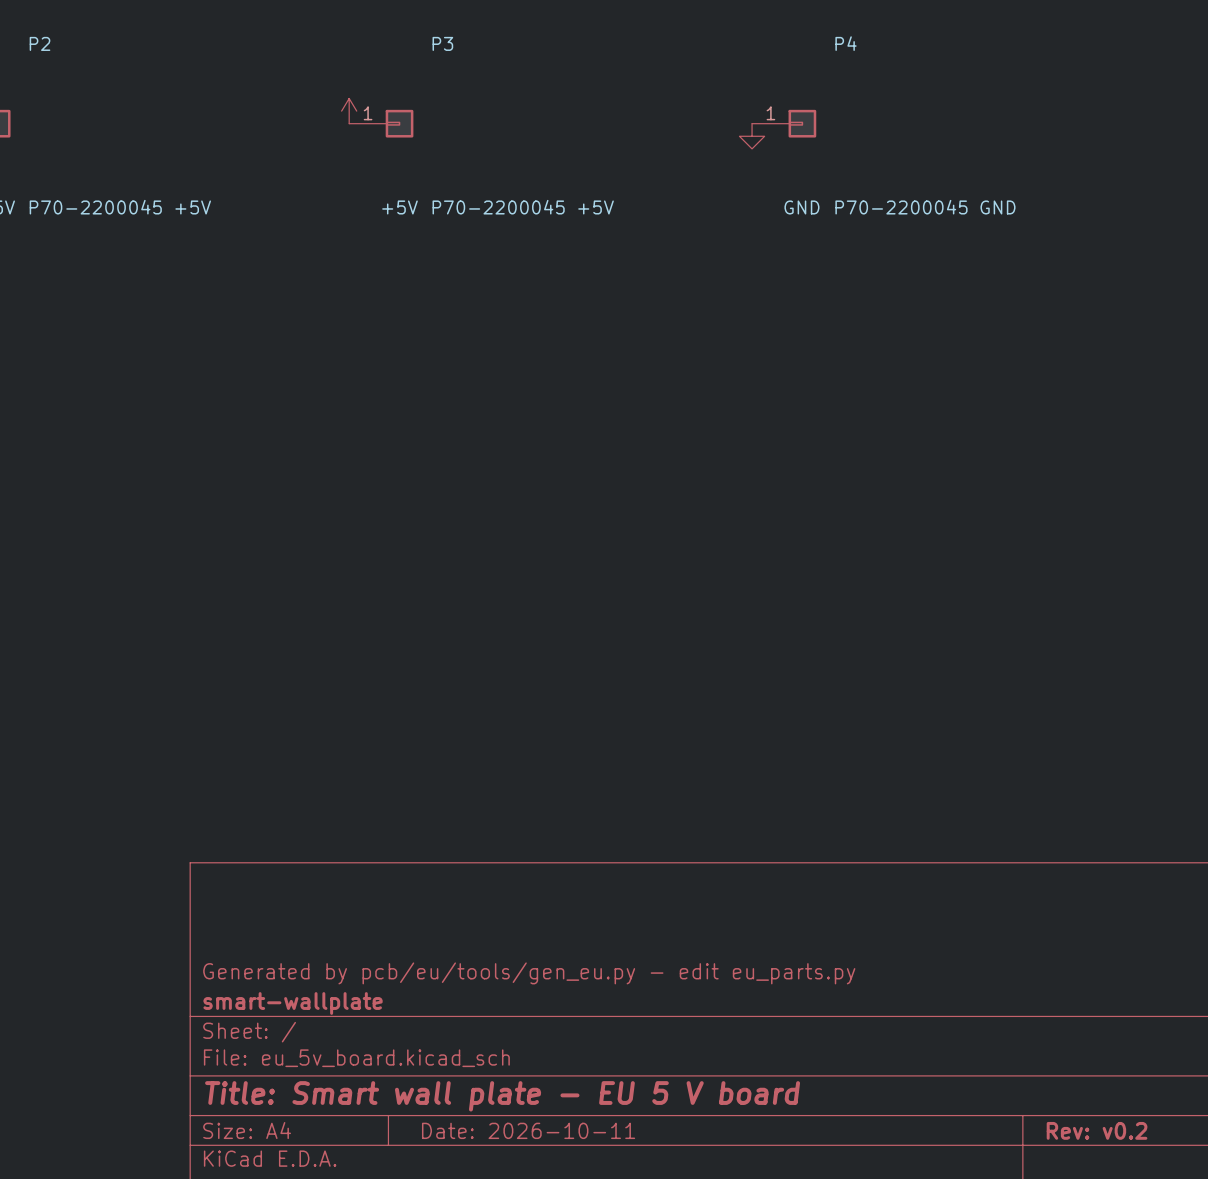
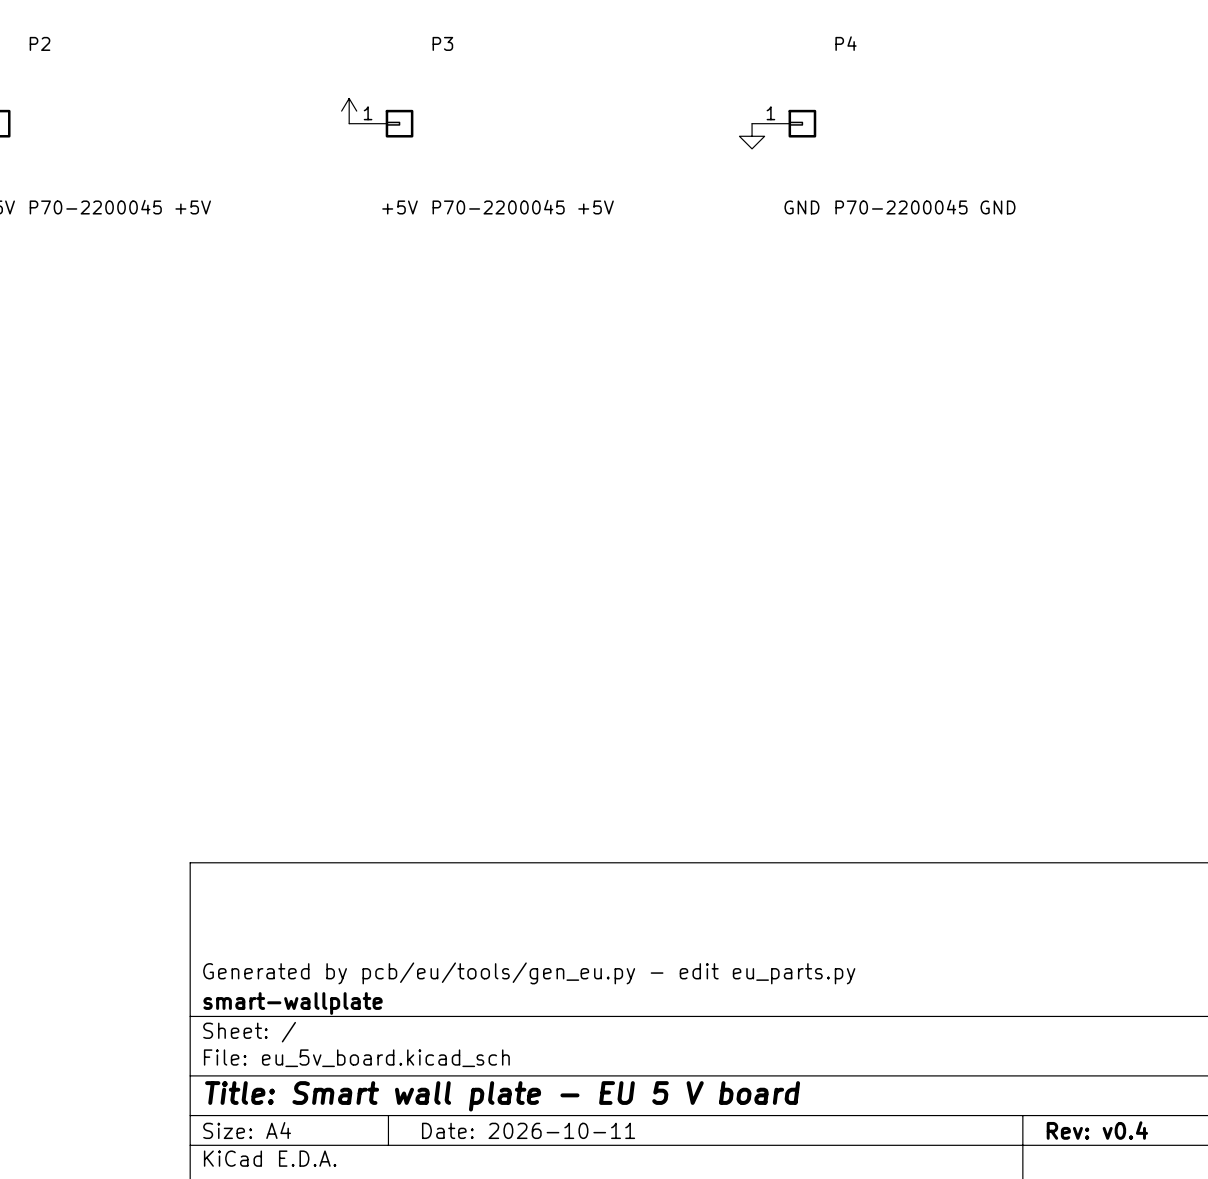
title block: Rev: v0.2 (1097, 1130) -> Rev: v0.4 (1097, 1130)

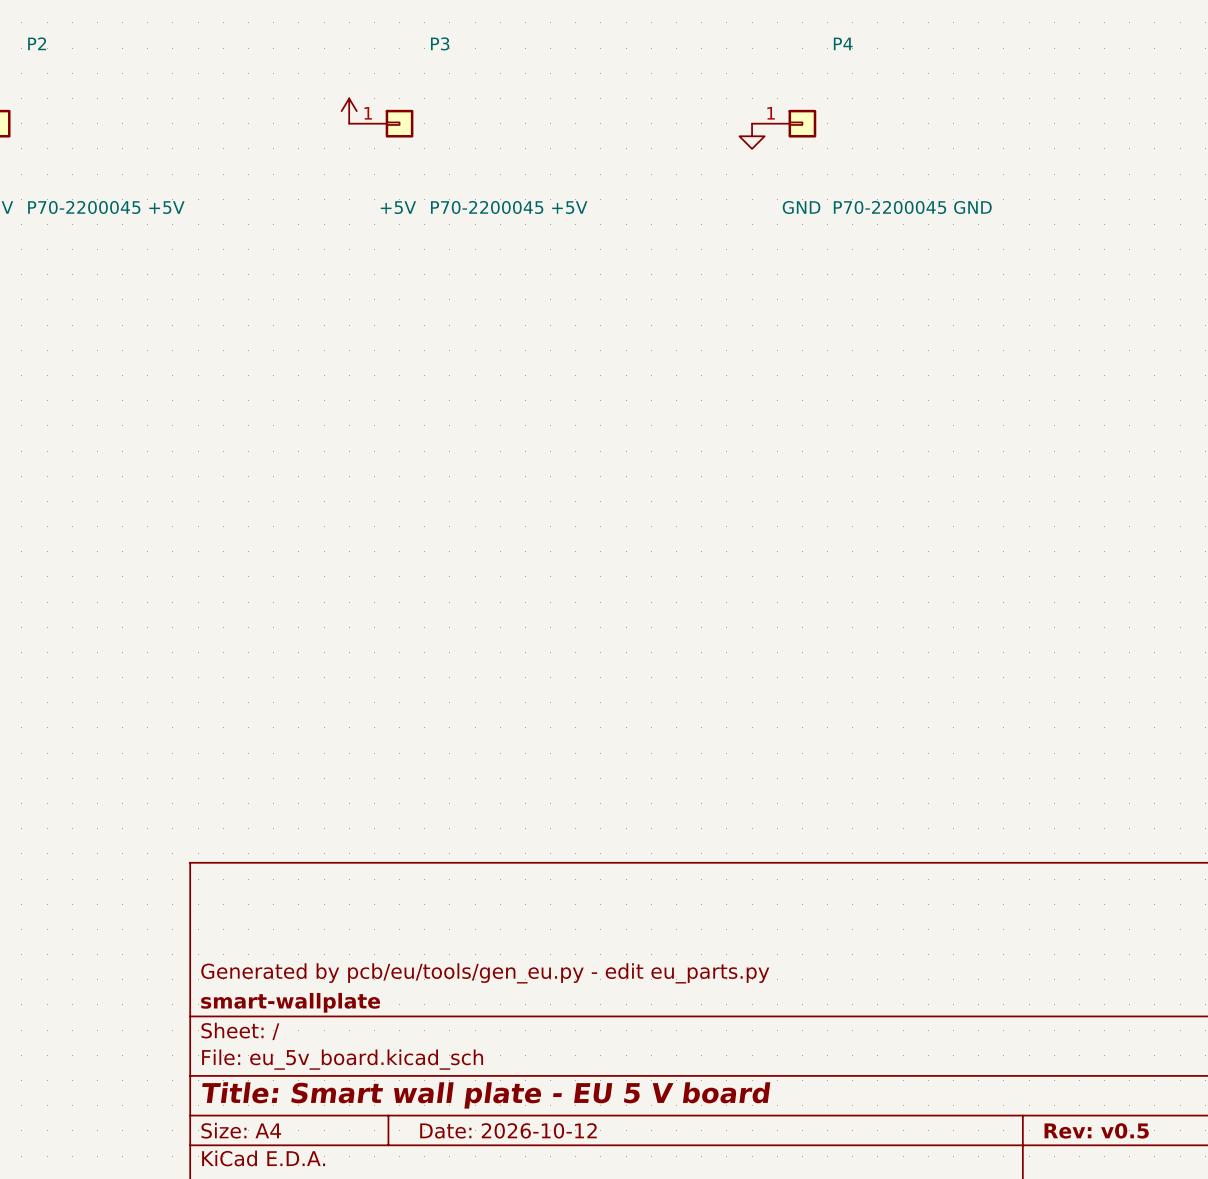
title block: Date: 2026-10-11 (528, 1130) -> Date: 2026-10-12 (508, 1130)
title block: Rev: v0.4 (1097, 1130) -> Rev: v0.5 (1096, 1130)

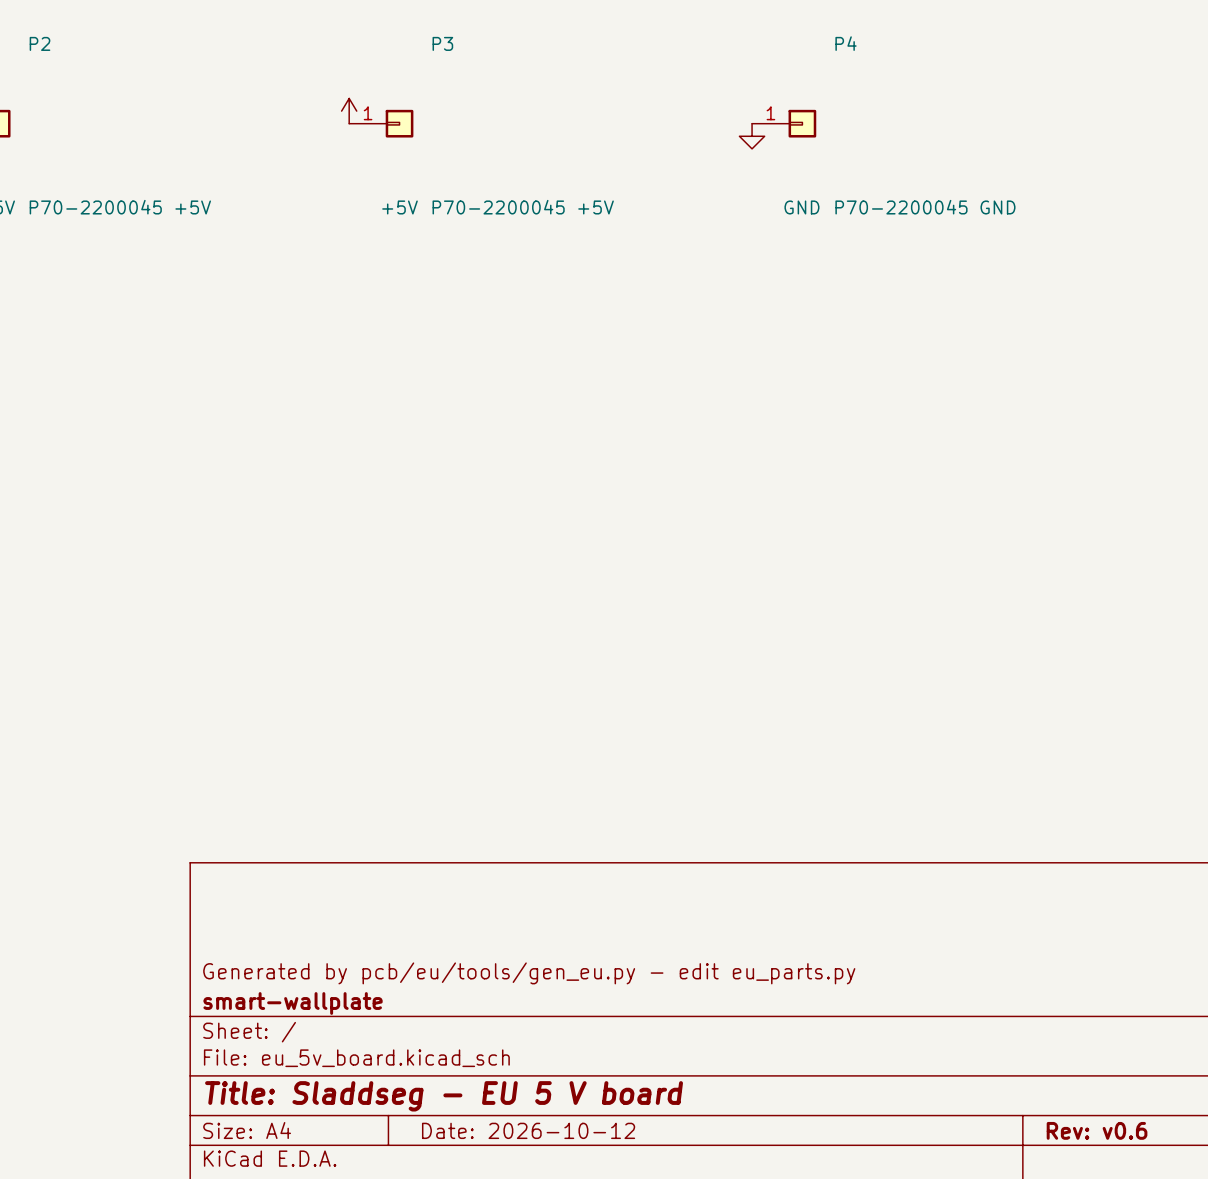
title block: Title: Smart wall plate - EU 5 V board (486, 1095) -> Title: Sladdseg - EU 5 V board (444, 1096)
title block: Rev: v0.5 (1096, 1130) -> Rev: v0.6 (1097, 1130)

